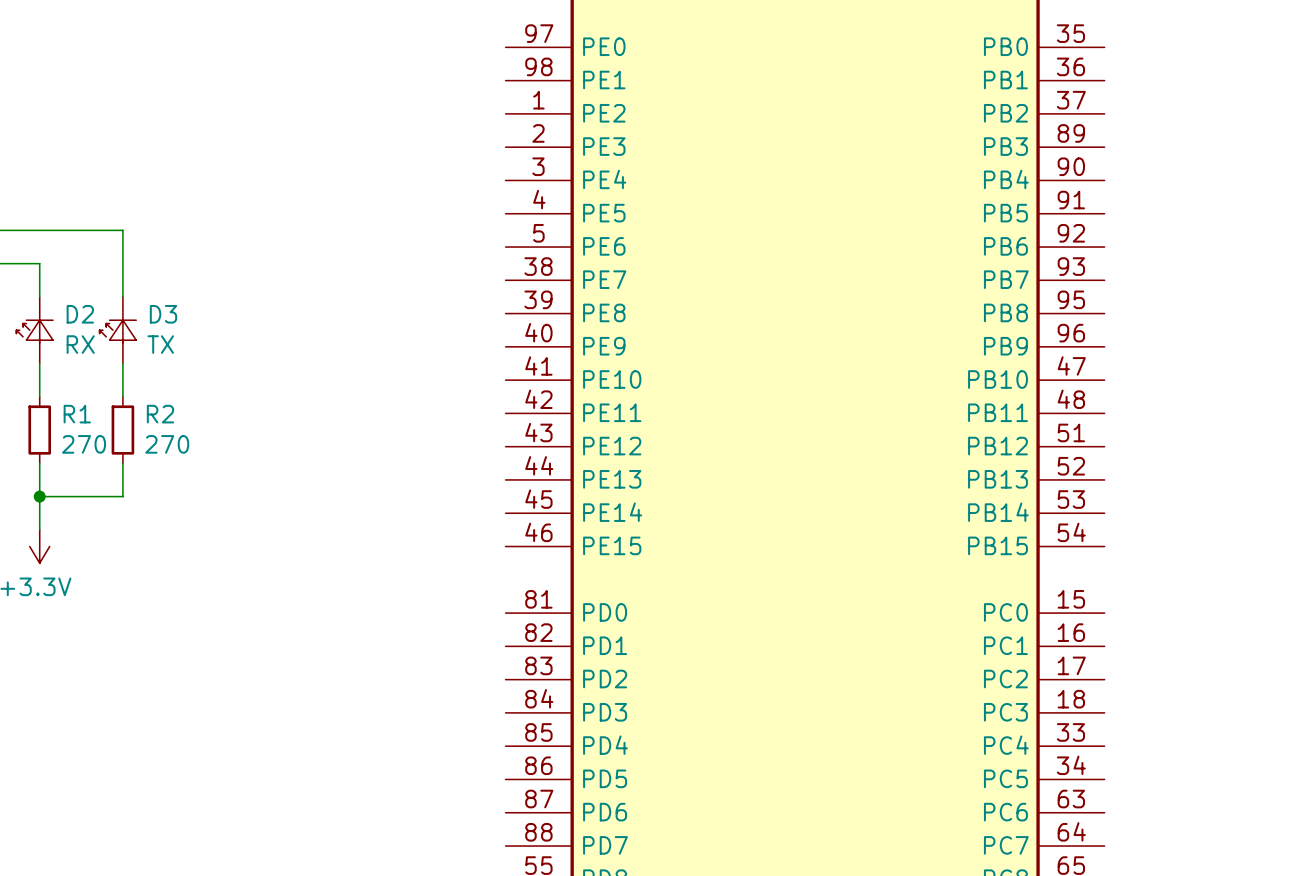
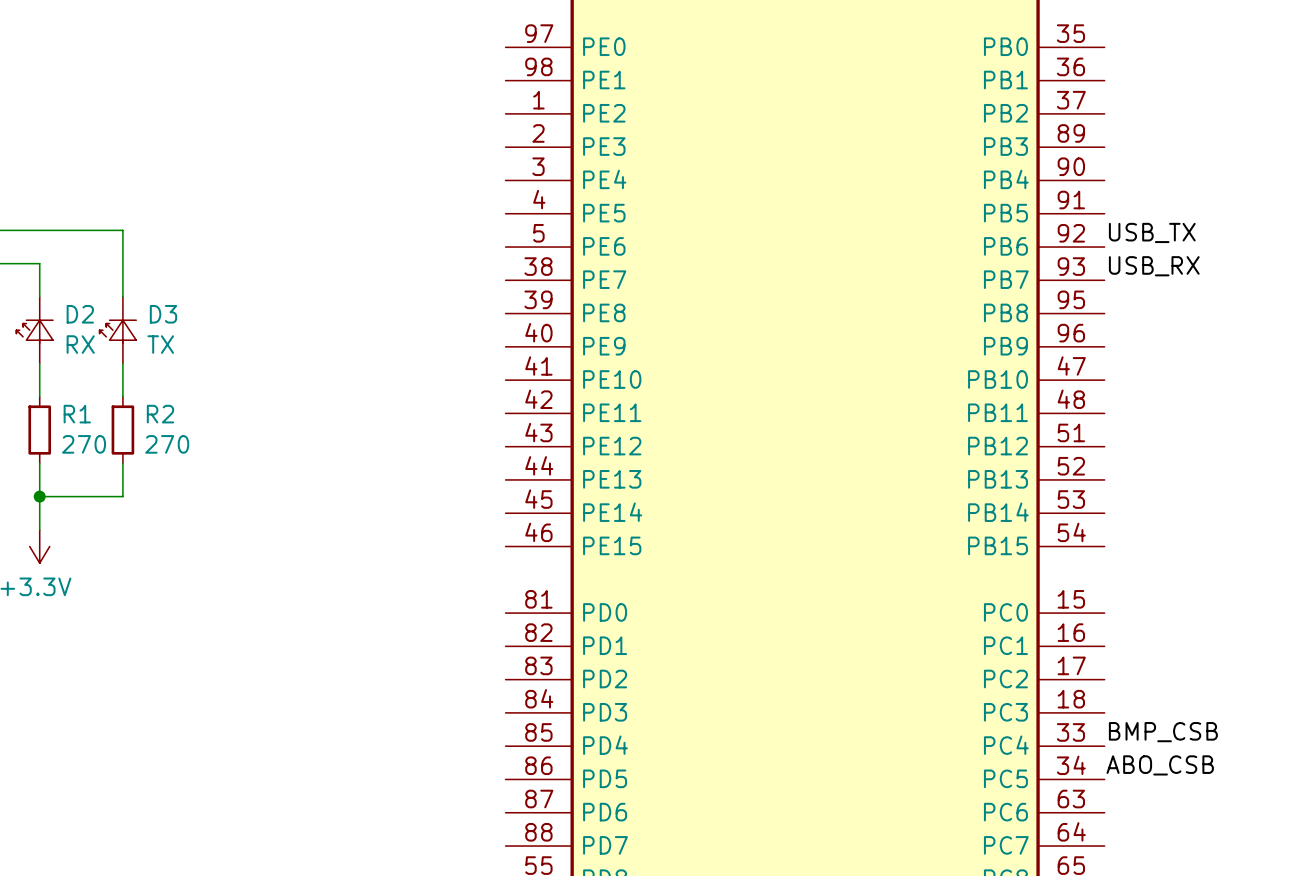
label: none -> USB_TX (1152, 232)
label: none -> USB_RX (1154, 266)
label: none -> BMP_CSB (1163, 732)
label: none -> ABO_CSB (1160, 765)

